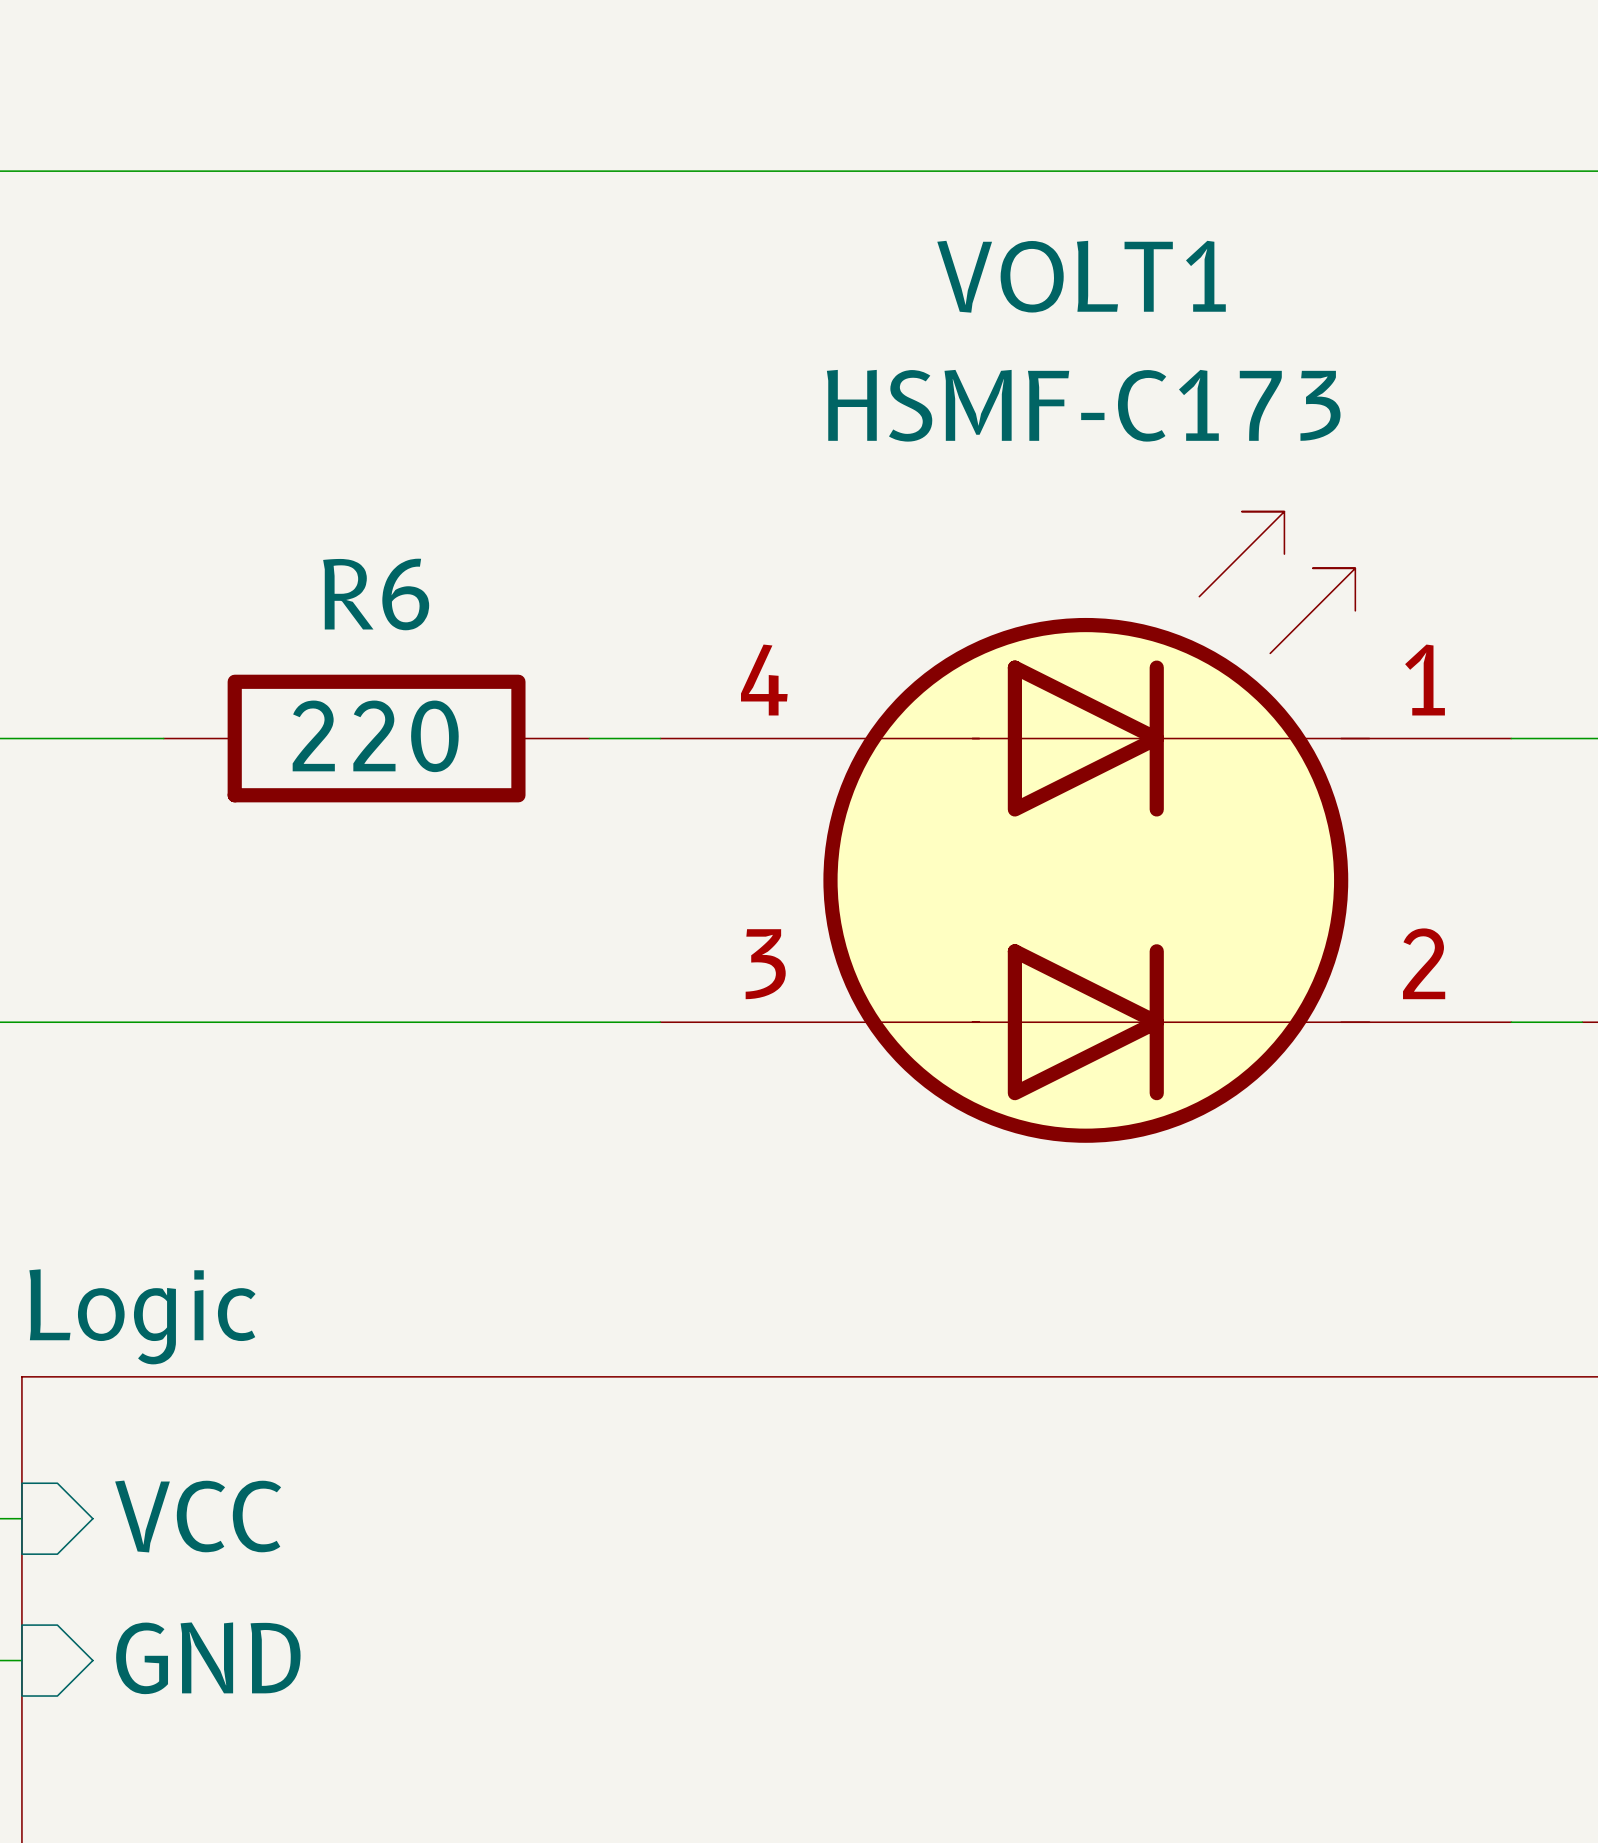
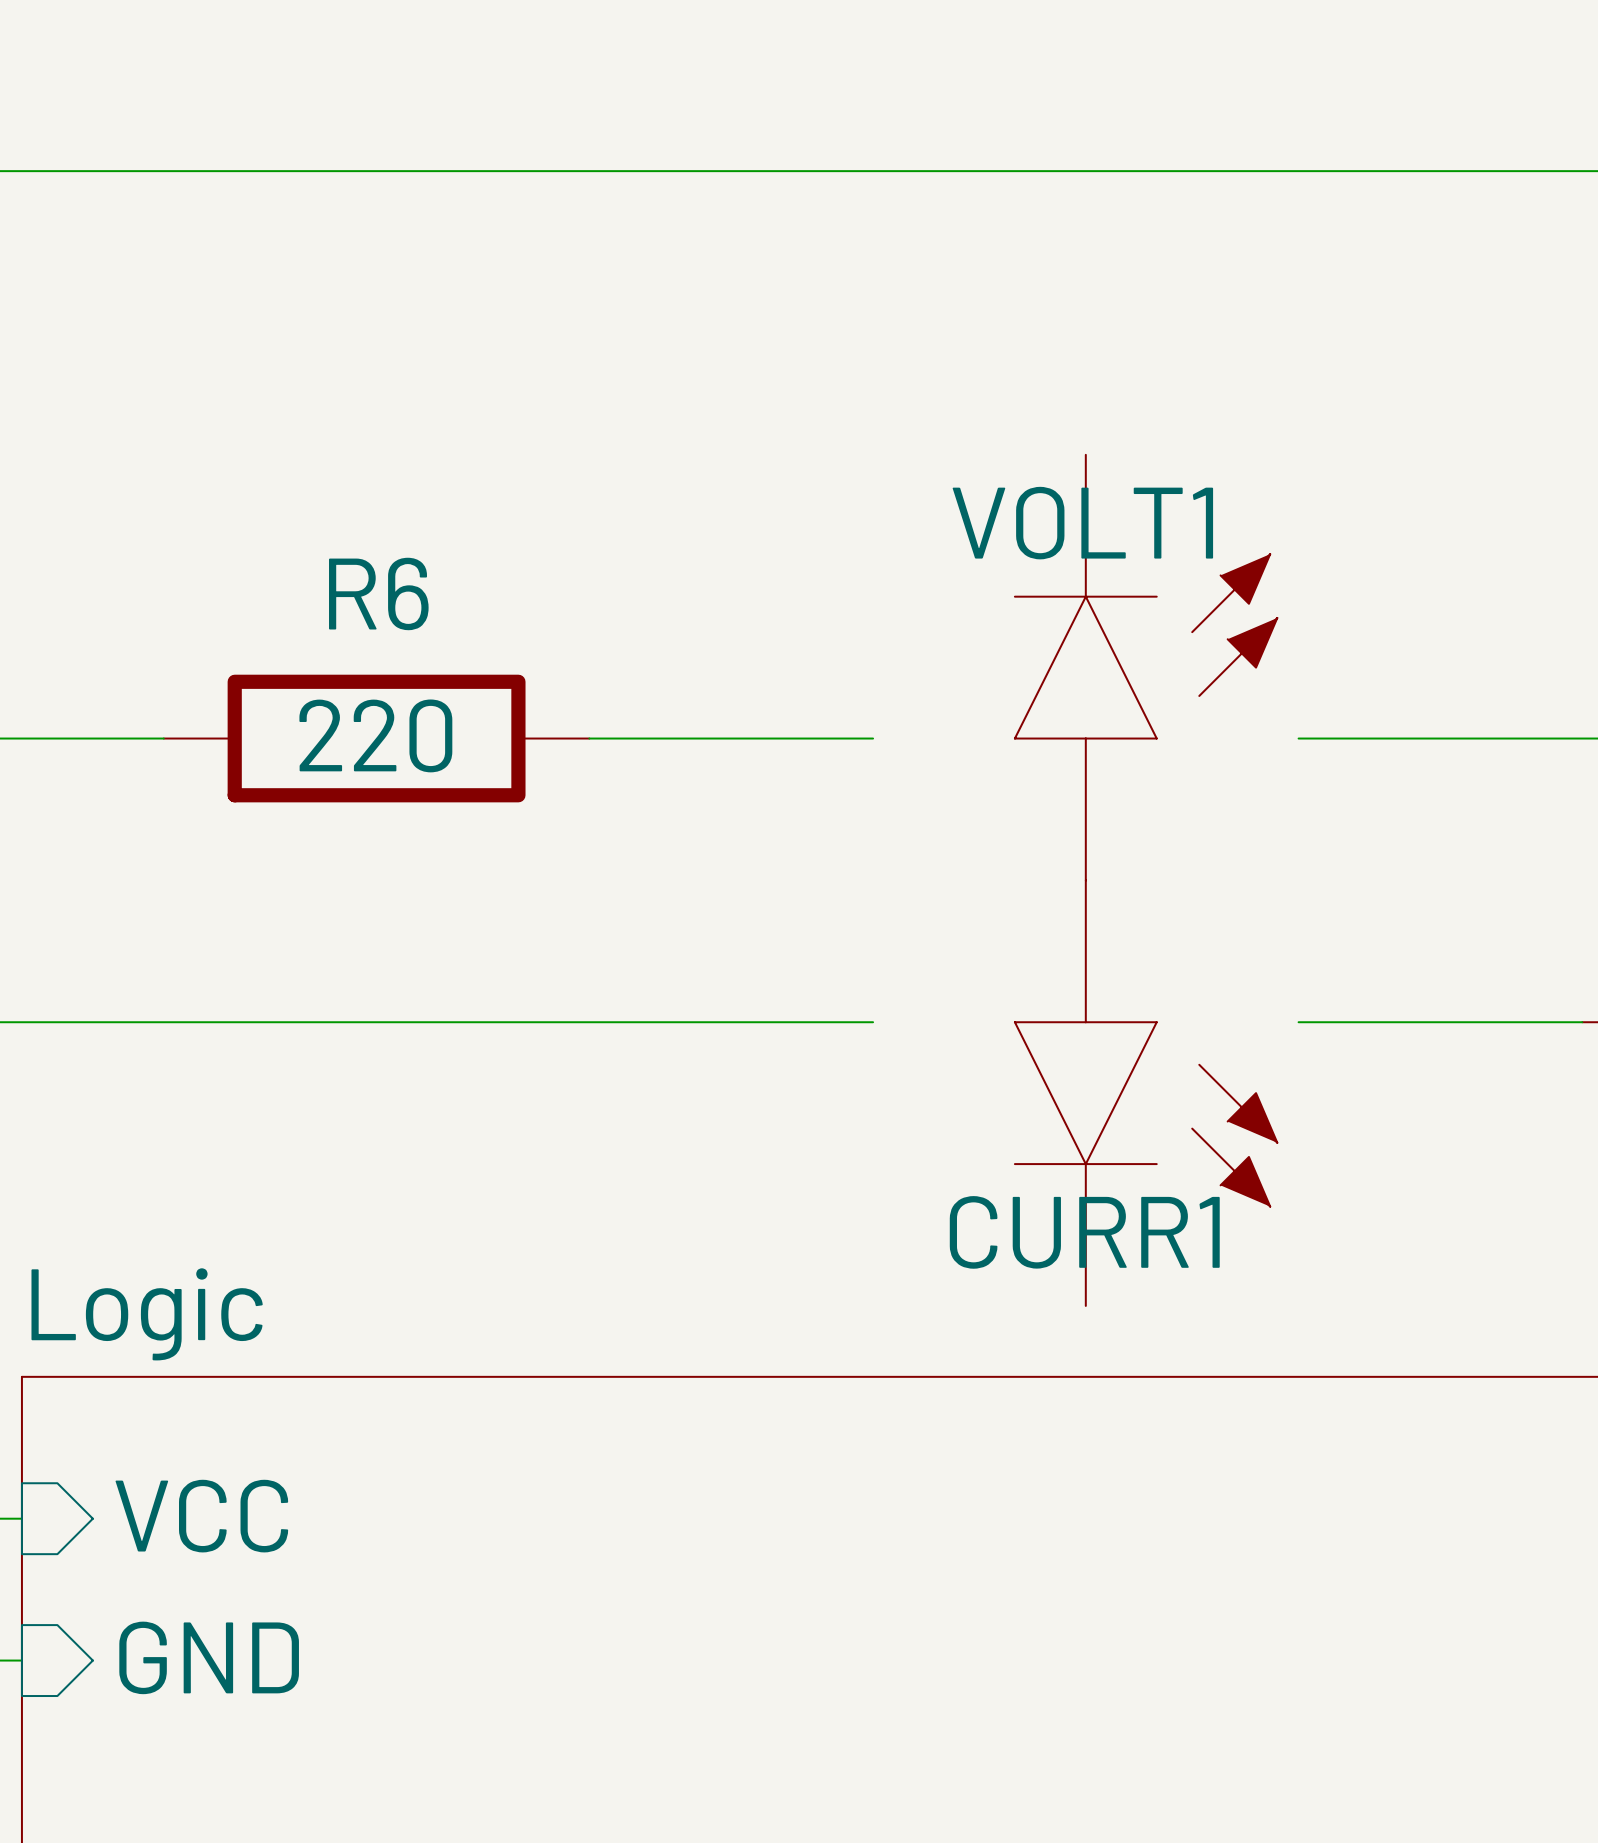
VOLT1 name position: VOLT1 (1081, 276) -> VOLT1 (1082, 523)
VOLT1 value: HSMF-C173 (1083, 405) -> none
VOLT1 symbol: [660, 511, 1512, 1143] -> [1014, 454, 1278, 881]
CURR1: none -> (1146, 1093)

